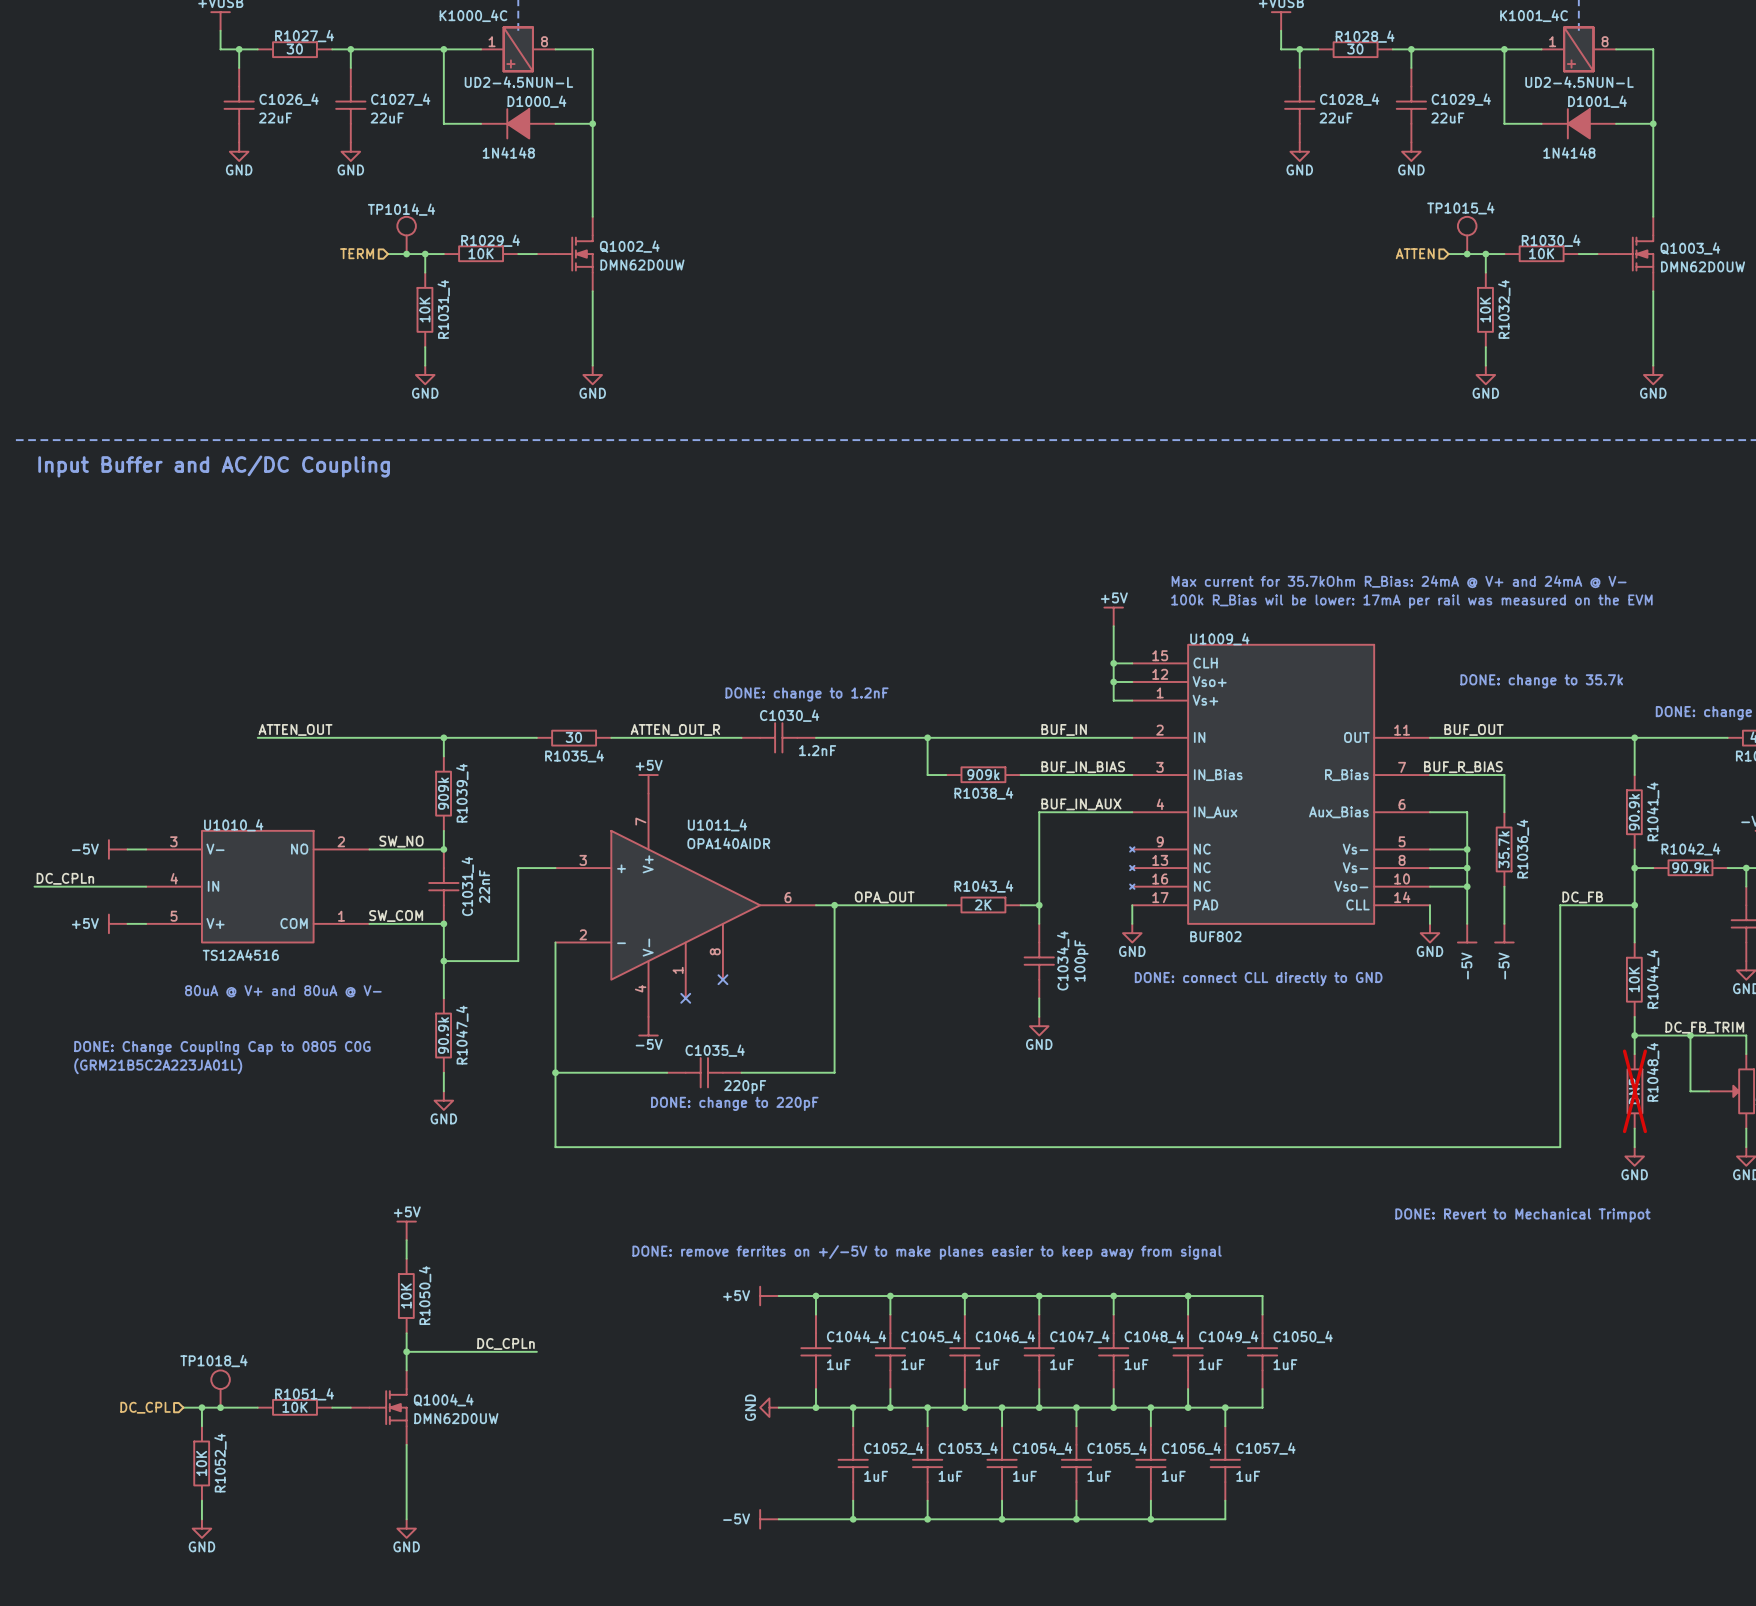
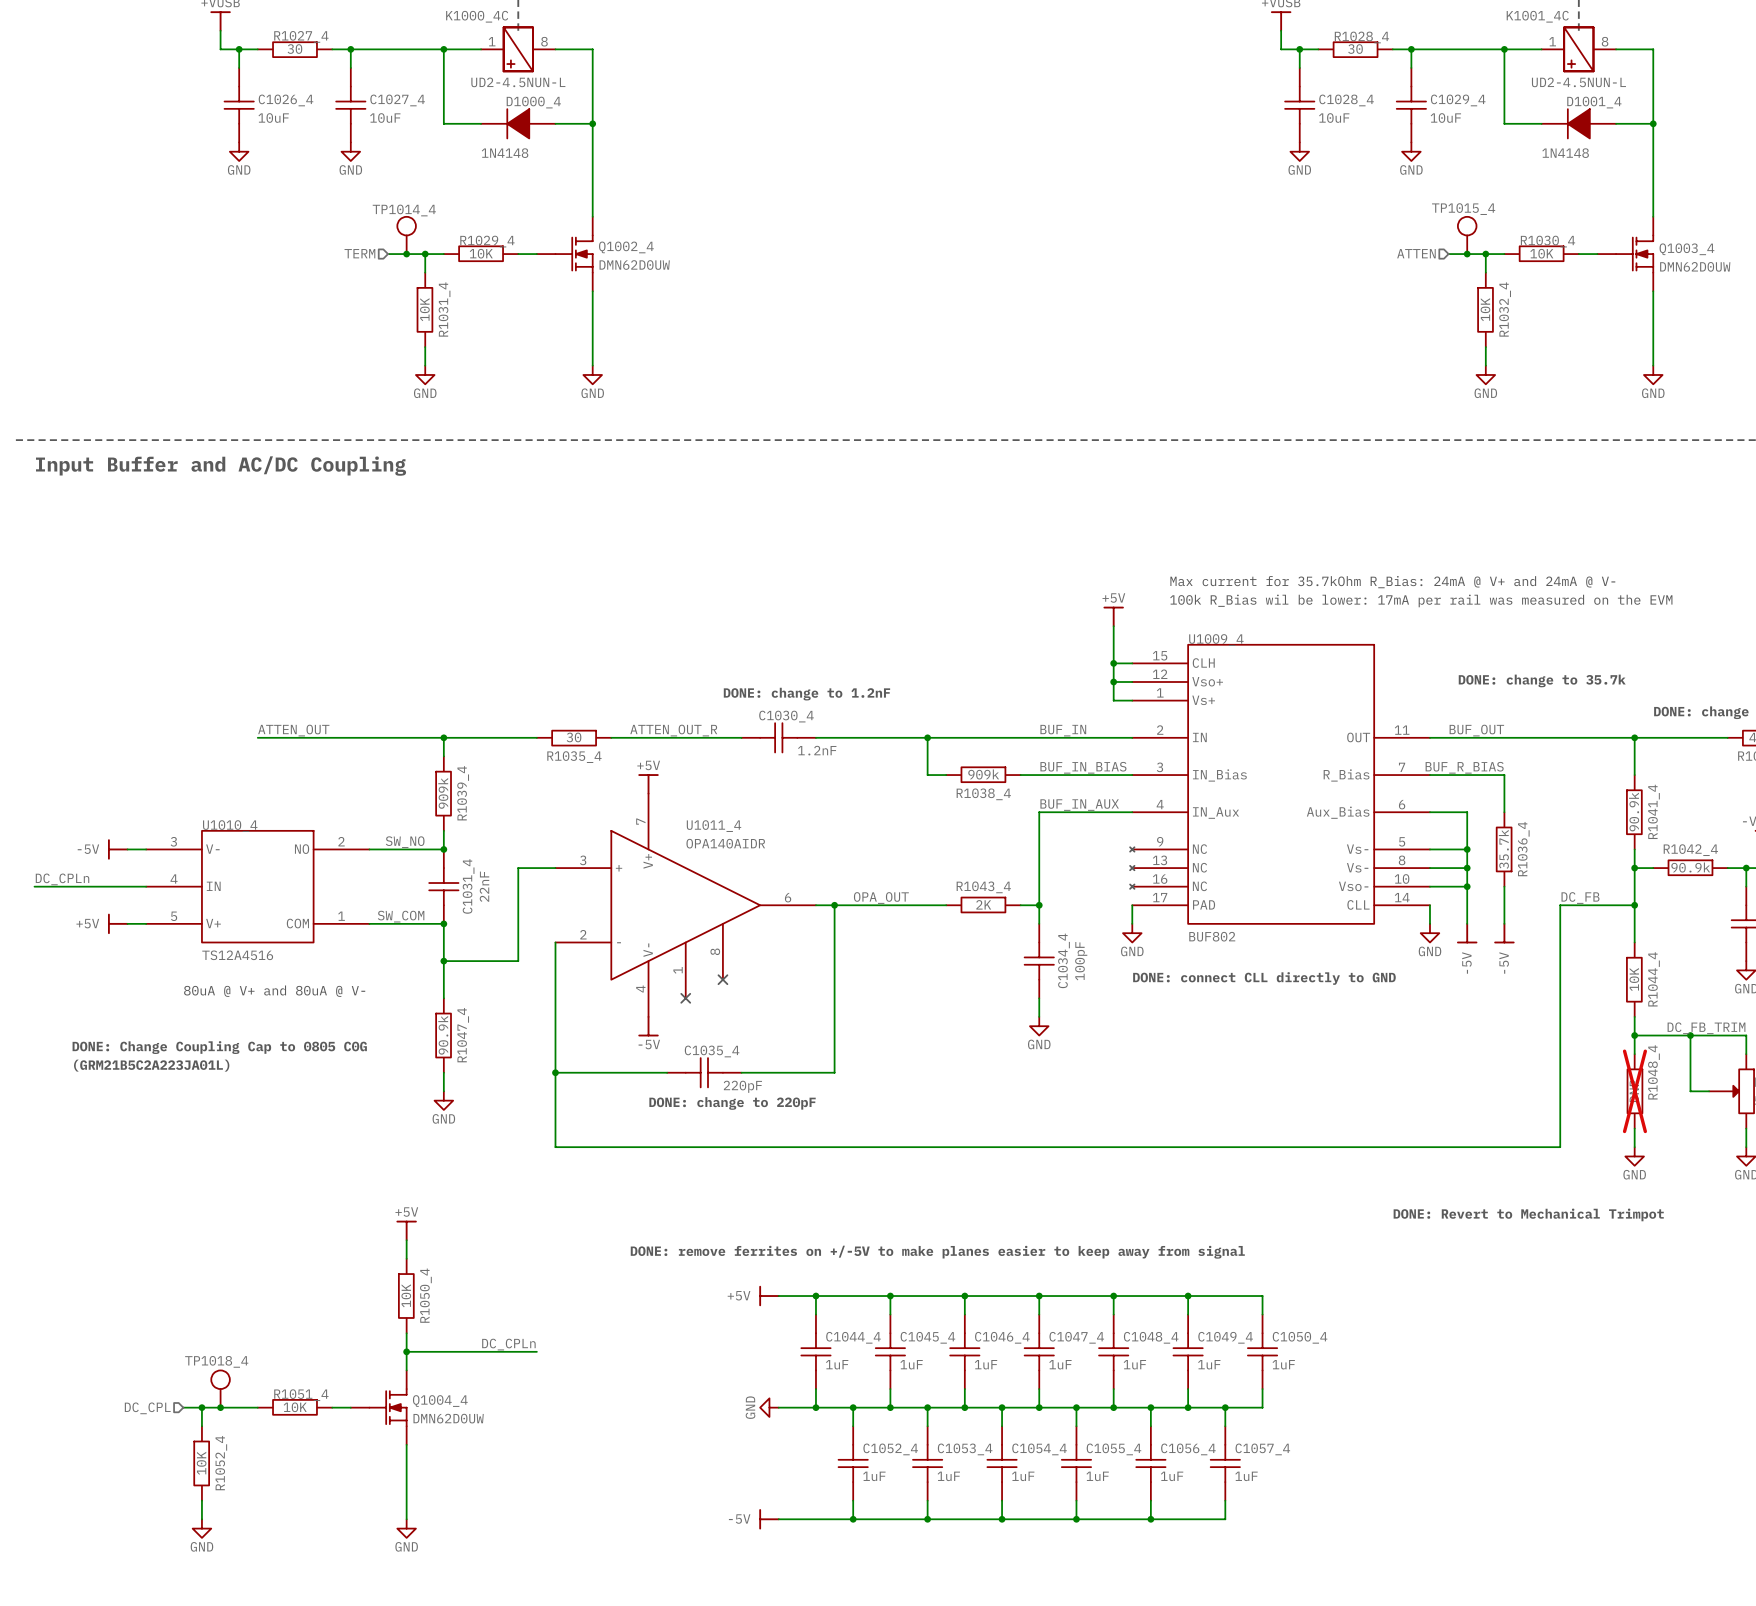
C1026_4 value: 22uF (275, 118) -> 10uF (273, 118)
C1027_4 value: 22uF (387, 118) -> 10uF (385, 118)
C1028_4 value: 22uF (1336, 118) -> 10uF (1334, 118)
C1029_4 value: 22uF (1447, 118) -> 10uF (1445, 118)

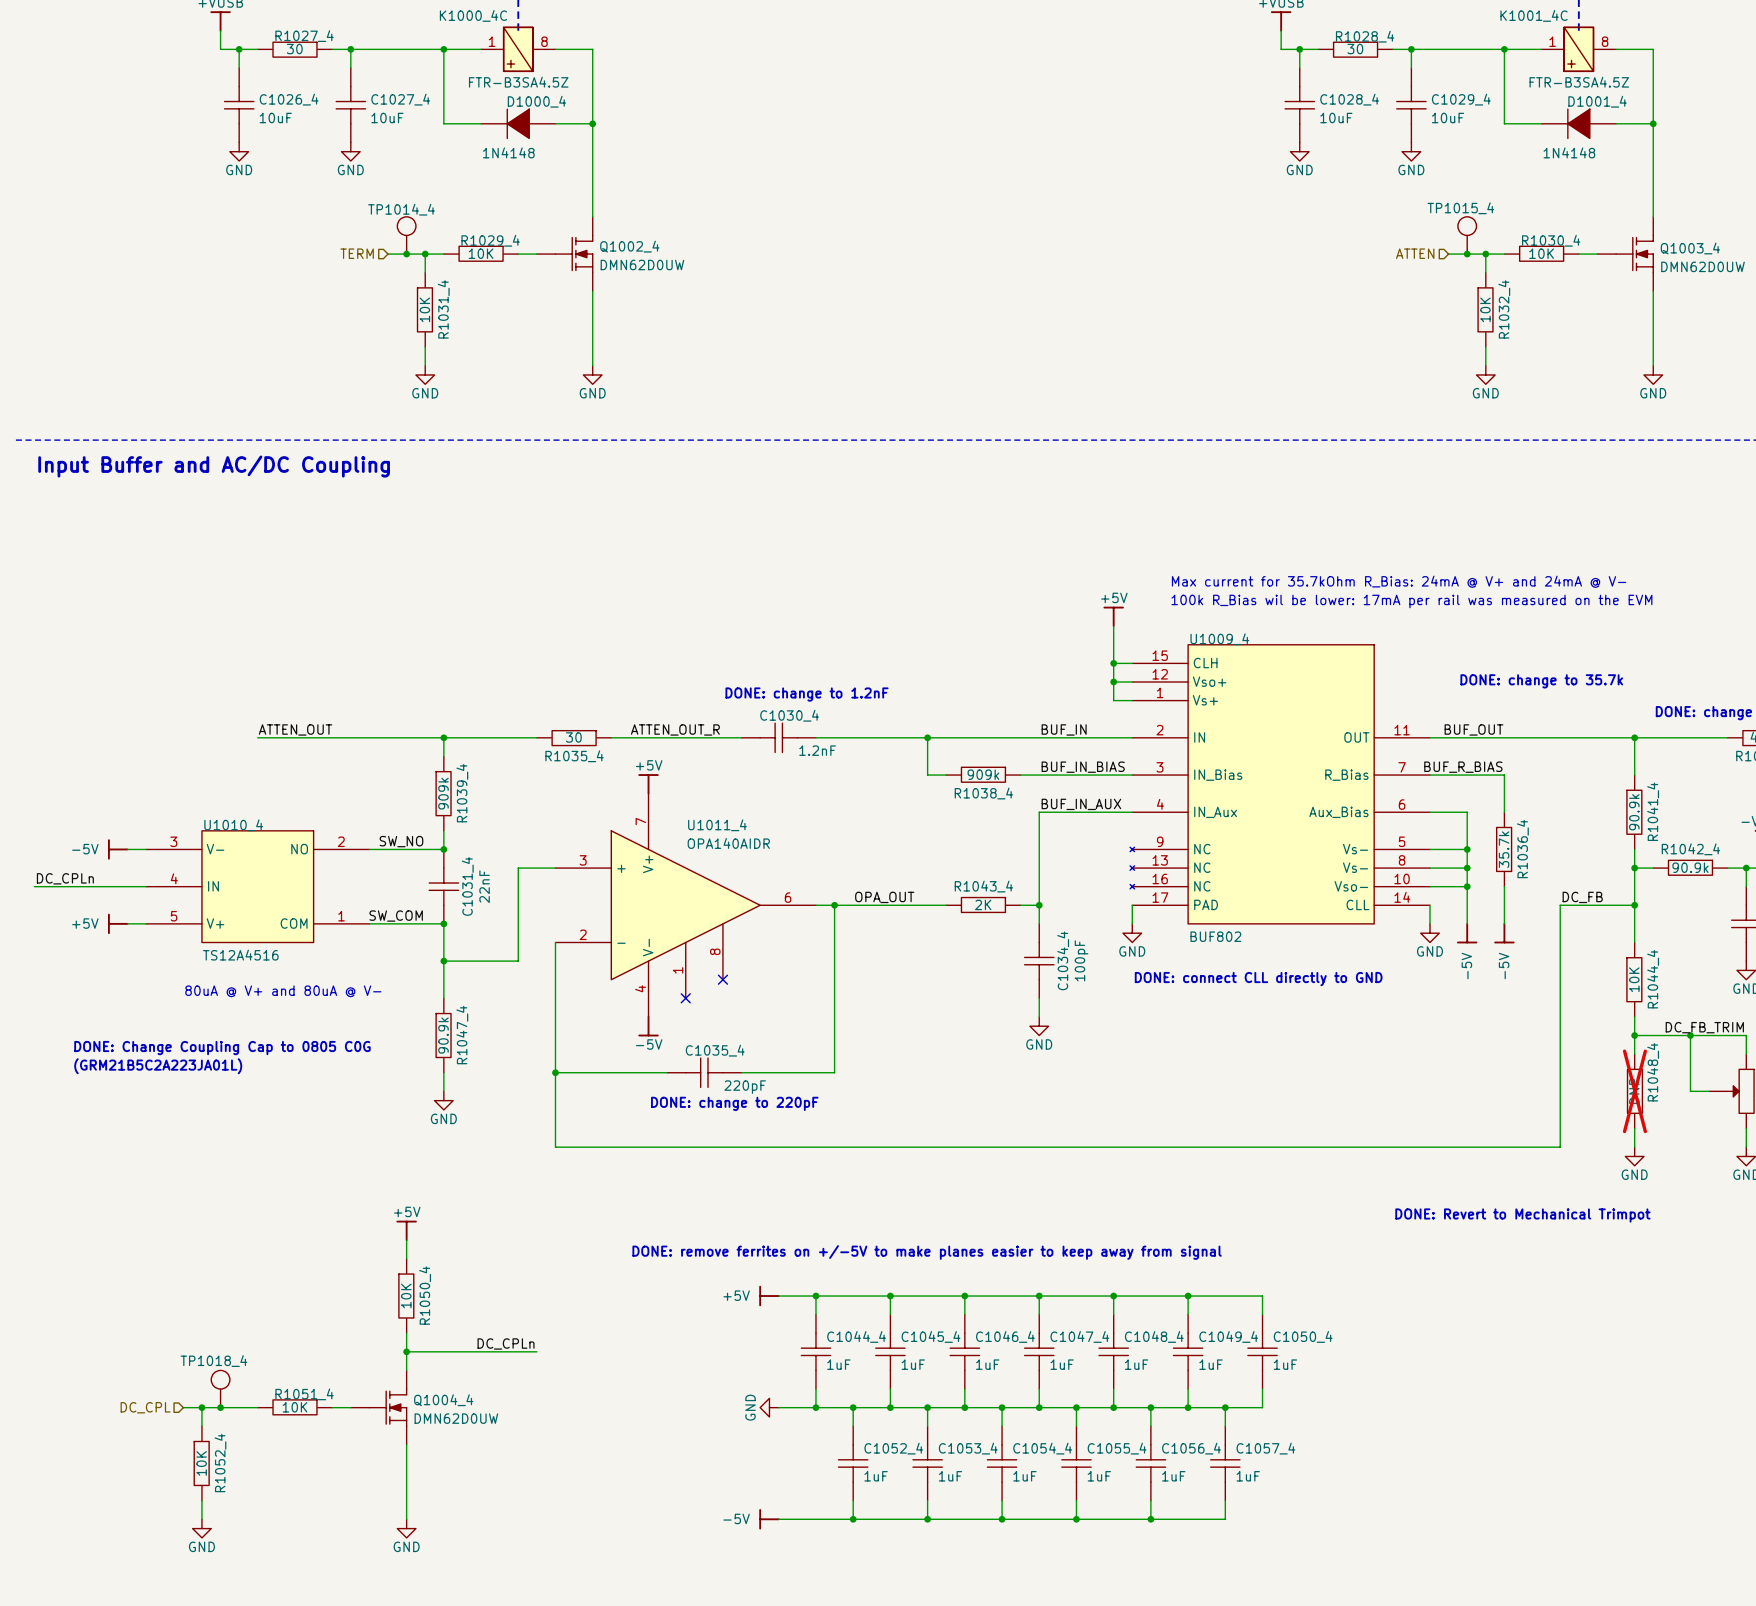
K1000_4C value: UD2-4.5NUN-L (518, 82) -> FTR-B3SA4.5Z (518, 82)
K1001_4C value: UD2-4.5NUN-L (1578, 82) -> FTR-B3SA4.5Z (1579, 82)

